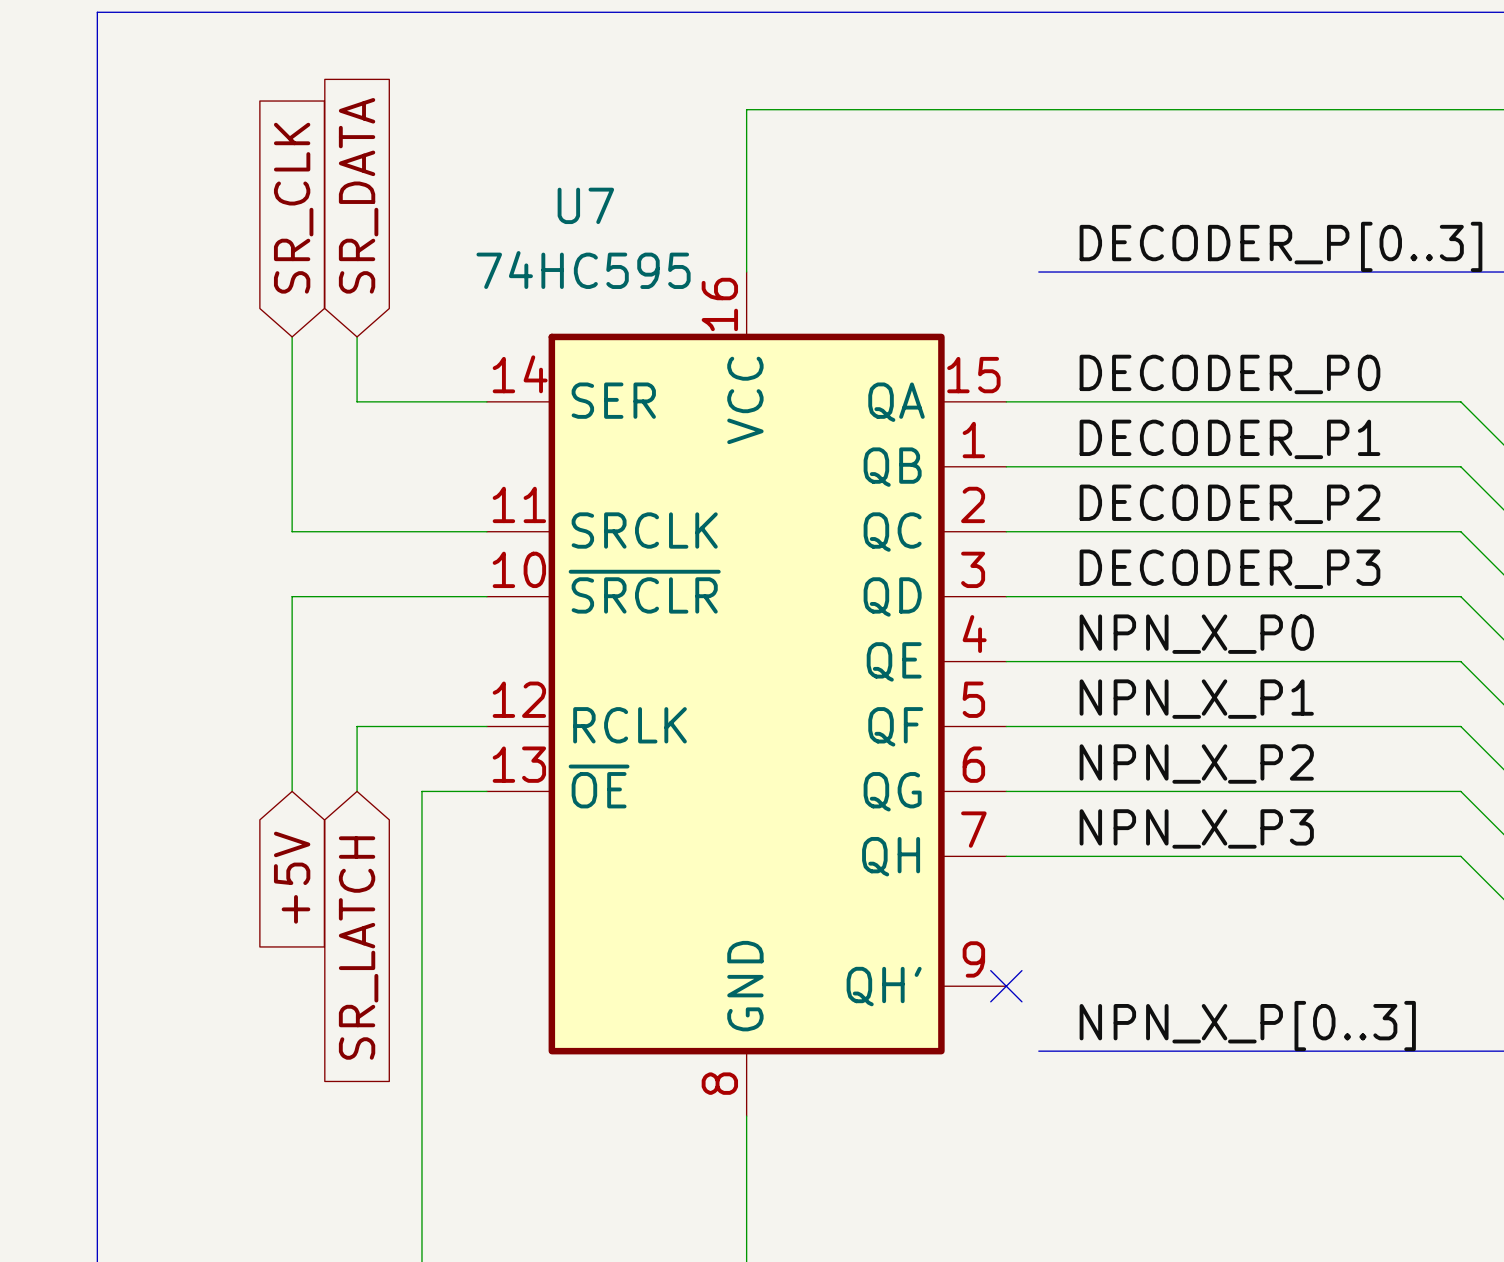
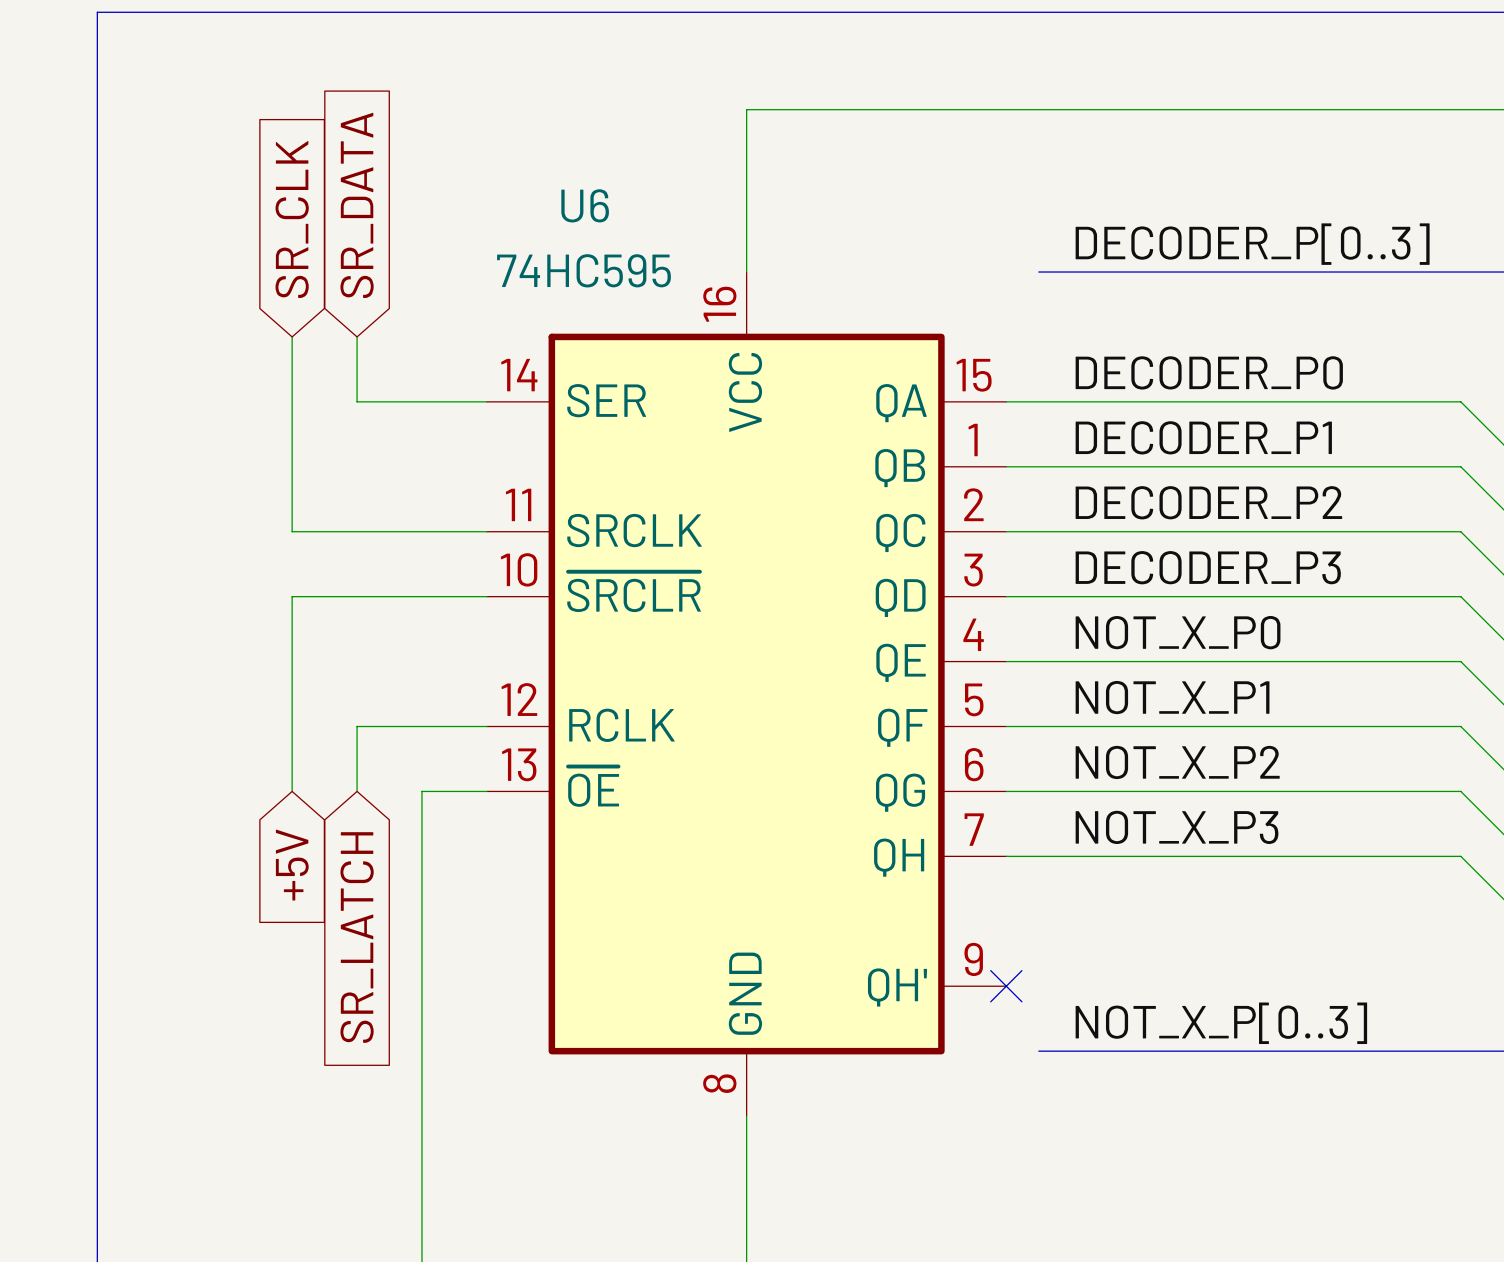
U7 name: U7 (585, 205) -> U6 (585, 205)
label: NPN_X_P0 (1196, 634) -> NOT_X_P0 (1178, 632)
label: NPN_X_P1 (1196, 699) -> NOT_X_P1 (1172, 697)
label: NPN_X_P2 (1196, 764) -> NOT_X_P2 (1177, 762)
label: NPN_X_P3 (1196, 828) -> NOT_X_P3 (1177, 827)
label: NPN_X_P[0..3] (1247, 1026) -> NOT_X_P[0..3] (1221, 1023)

